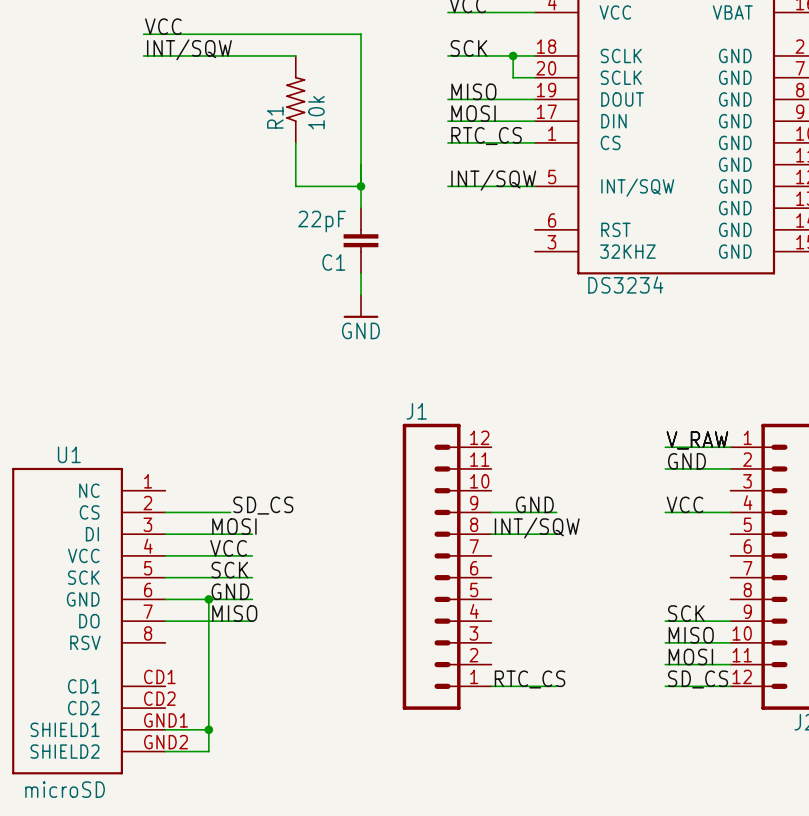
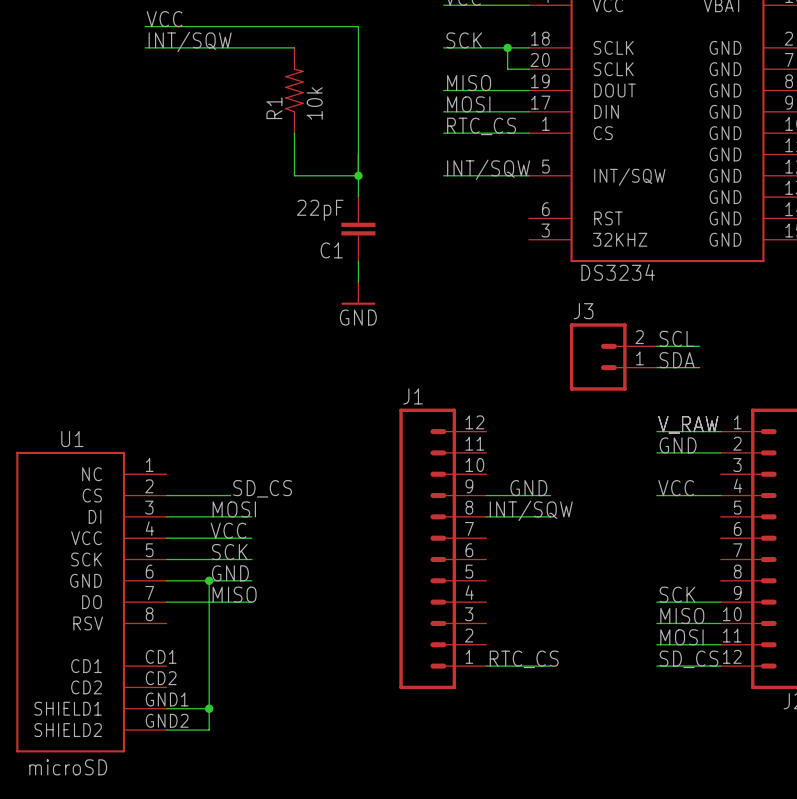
label: none -> SCL (676, 338)
wire: none -> (656, 346) (699, 346)
J3: none -> (613, 356)
label: none -> SDA (677, 360)
wire: none -> (656, 367) (699, 367)

